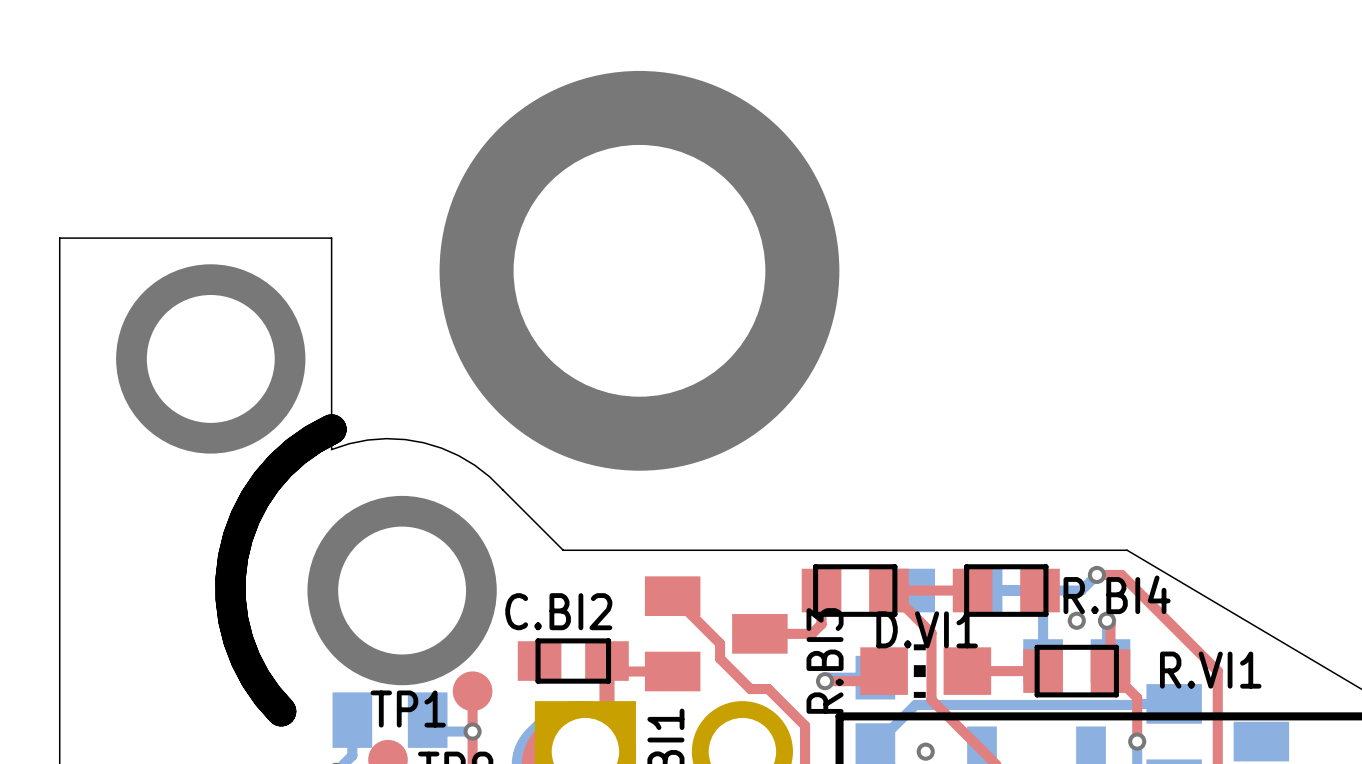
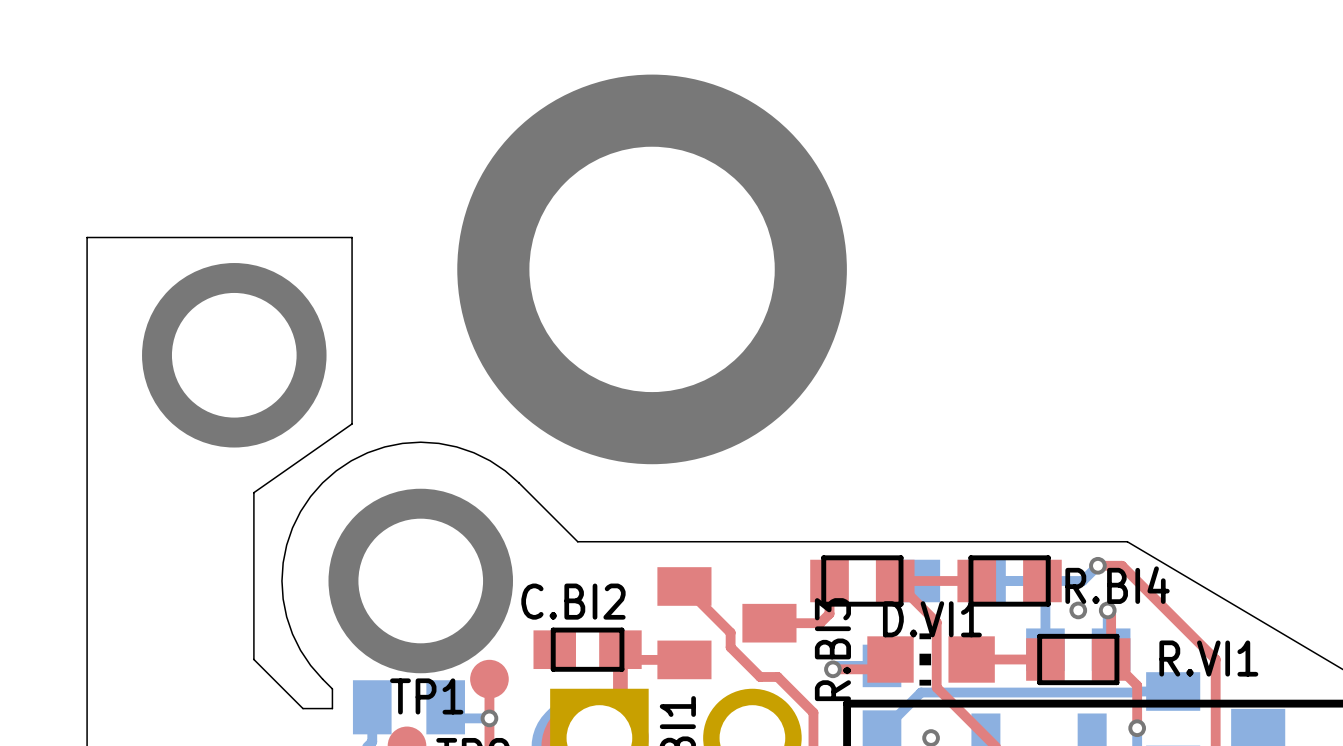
board edge: (331, 429) (331, 449) (367, 440) (386, 438) (423, 442) (458, 455) (474, 465) (502, 489) -> (352, 423) (253, 492) (253, 659) (302, 708) (332, 708) (332, 688) (310, 665) (292, 634) (283, 599) (283, 562) (292, 527) (300, 511) (322, 482) (351, 460) (367, 452) (402, 443) (420, 442) (438, 443) (473, 452) (490, 460) (518, 482)
board edge: (331, 429) (296, 451) (266, 481) (245, 517) (233, 557) (230, 599) (238, 640) (255, 678) (281, 711) (267, 695) (255, 678) (245, 659) (238, 640) (233, 619) (230, 599) (230, 578) (233, 557) (237, 536) (245, 517) (254, 498) (266, 481) (280, 465) (296, 451) (313, 439) (331, 429) -> none

